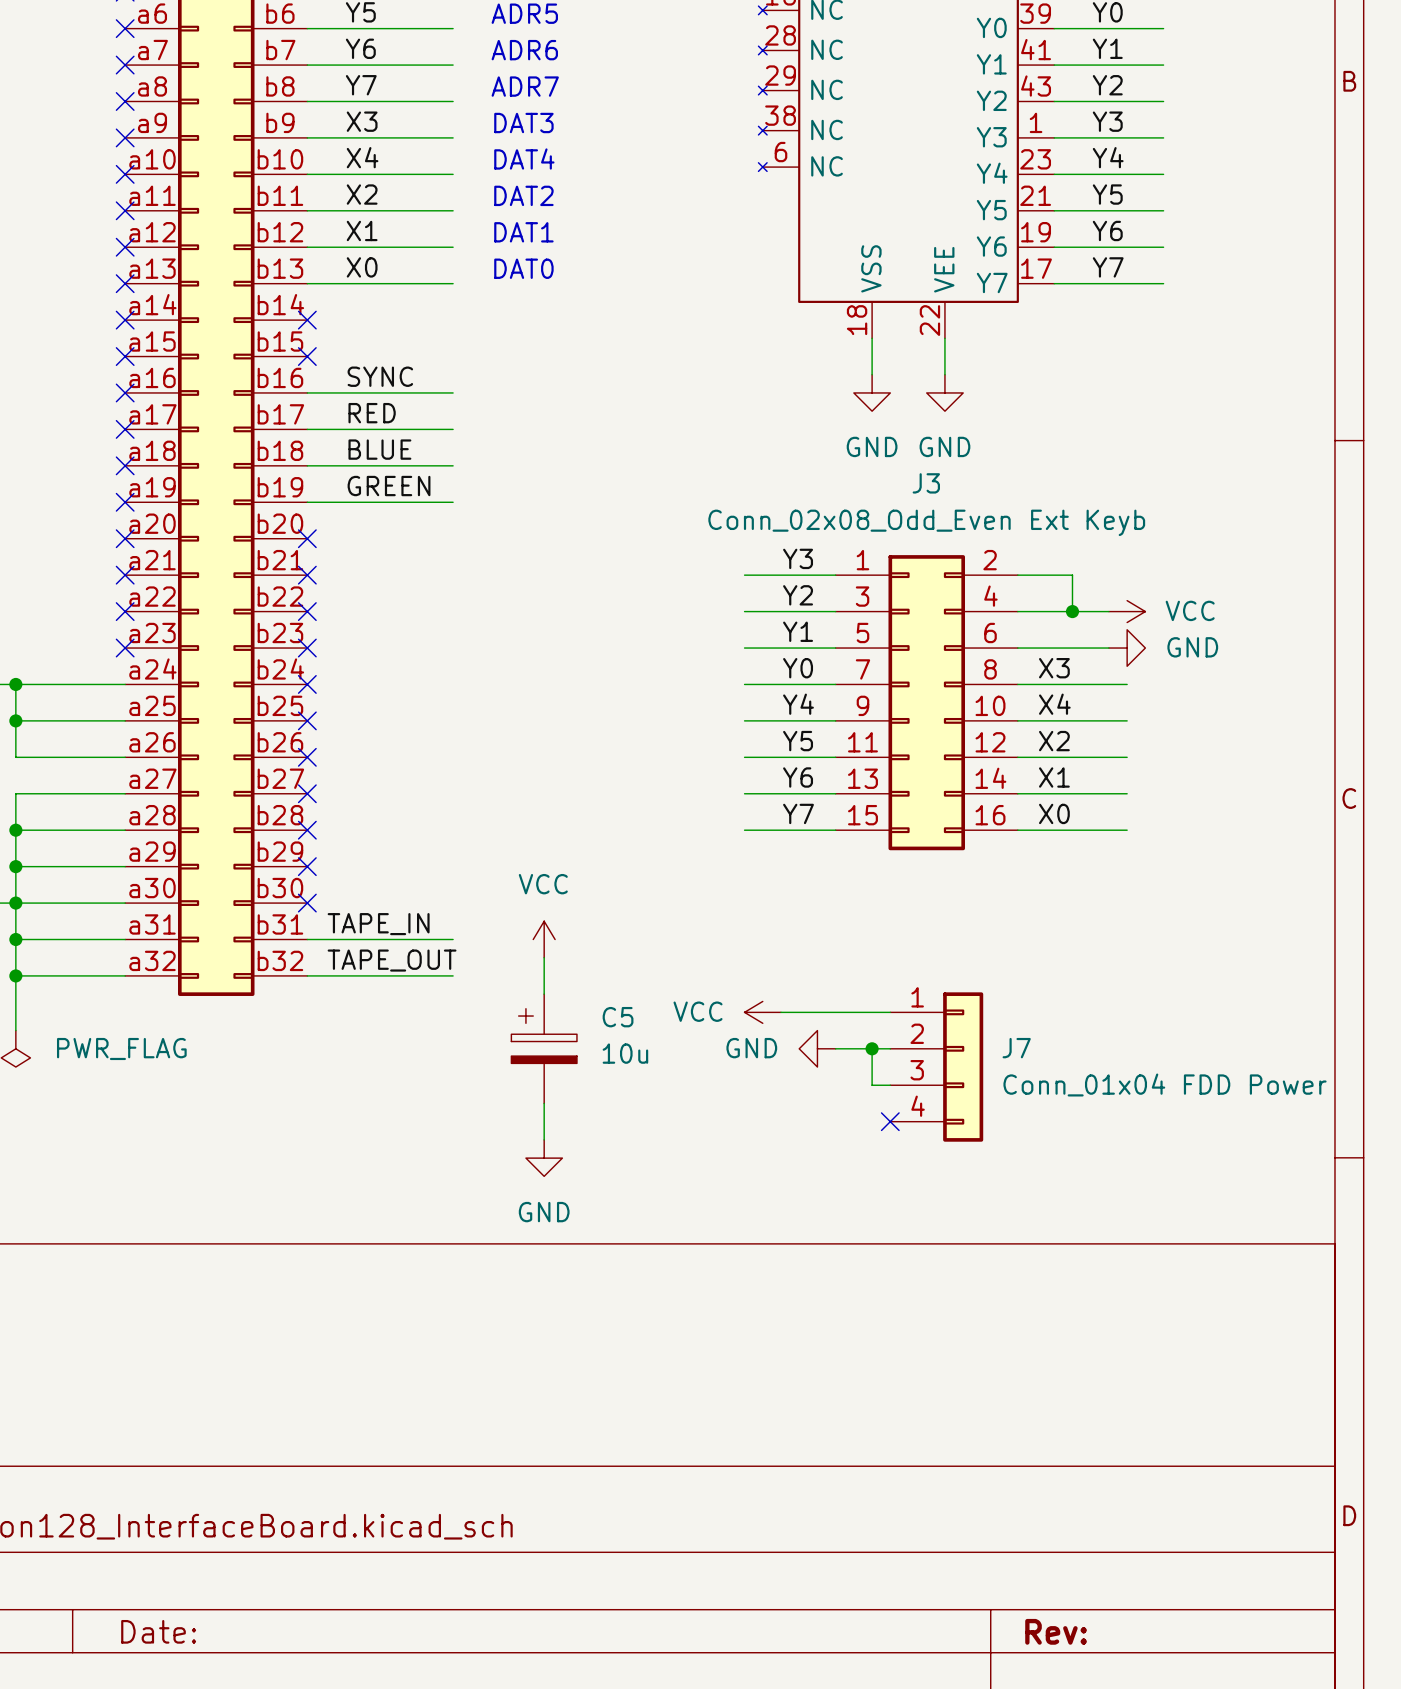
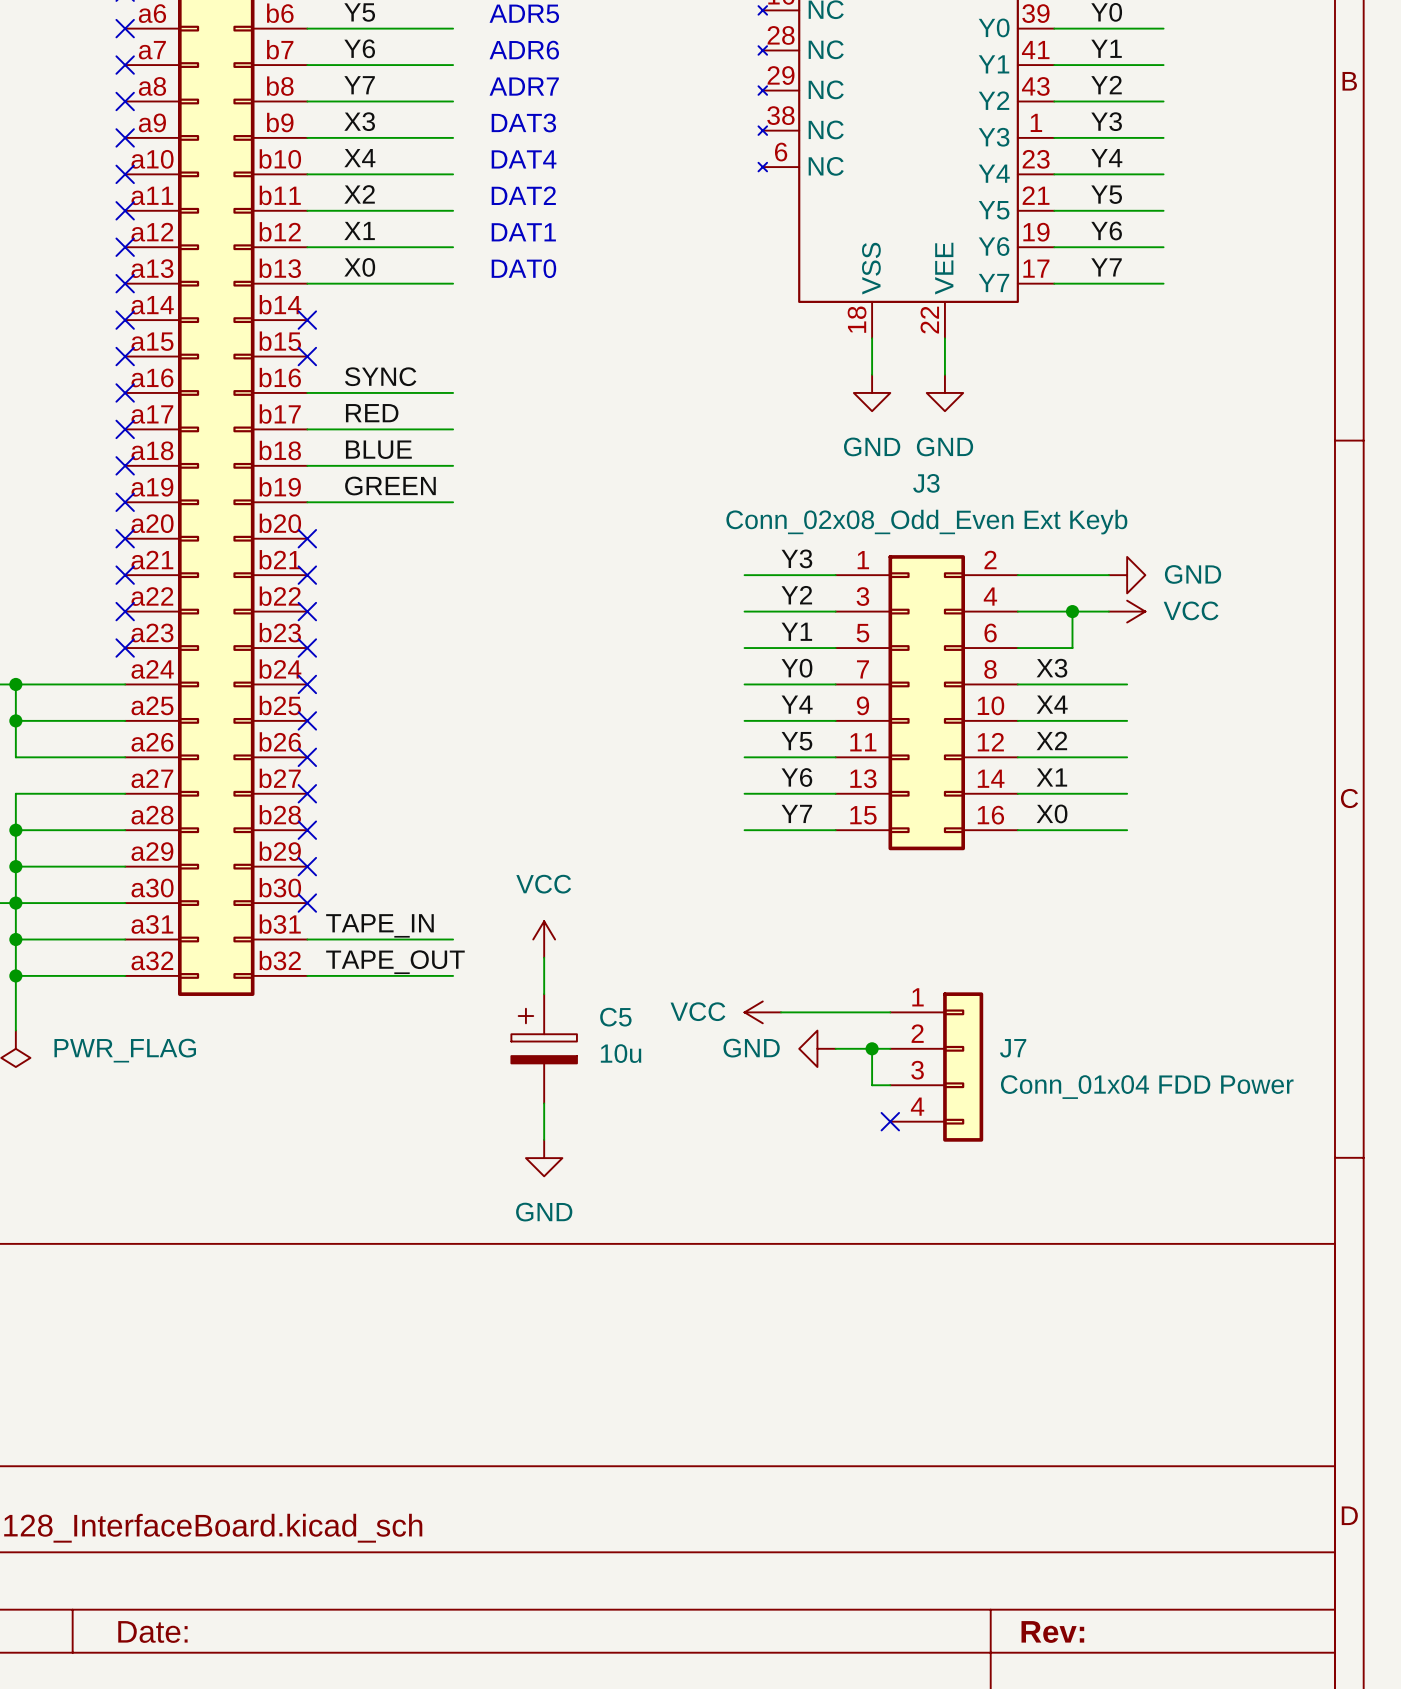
wire: (1072, 575) (1072, 611) -> (1072, 575) (1108, 575)
wire: (1072, 648) (1108, 648) -> (1072, 648) (1072, 611)
power symbol position: GND (1127, 648) -> GND (1127, 575)

